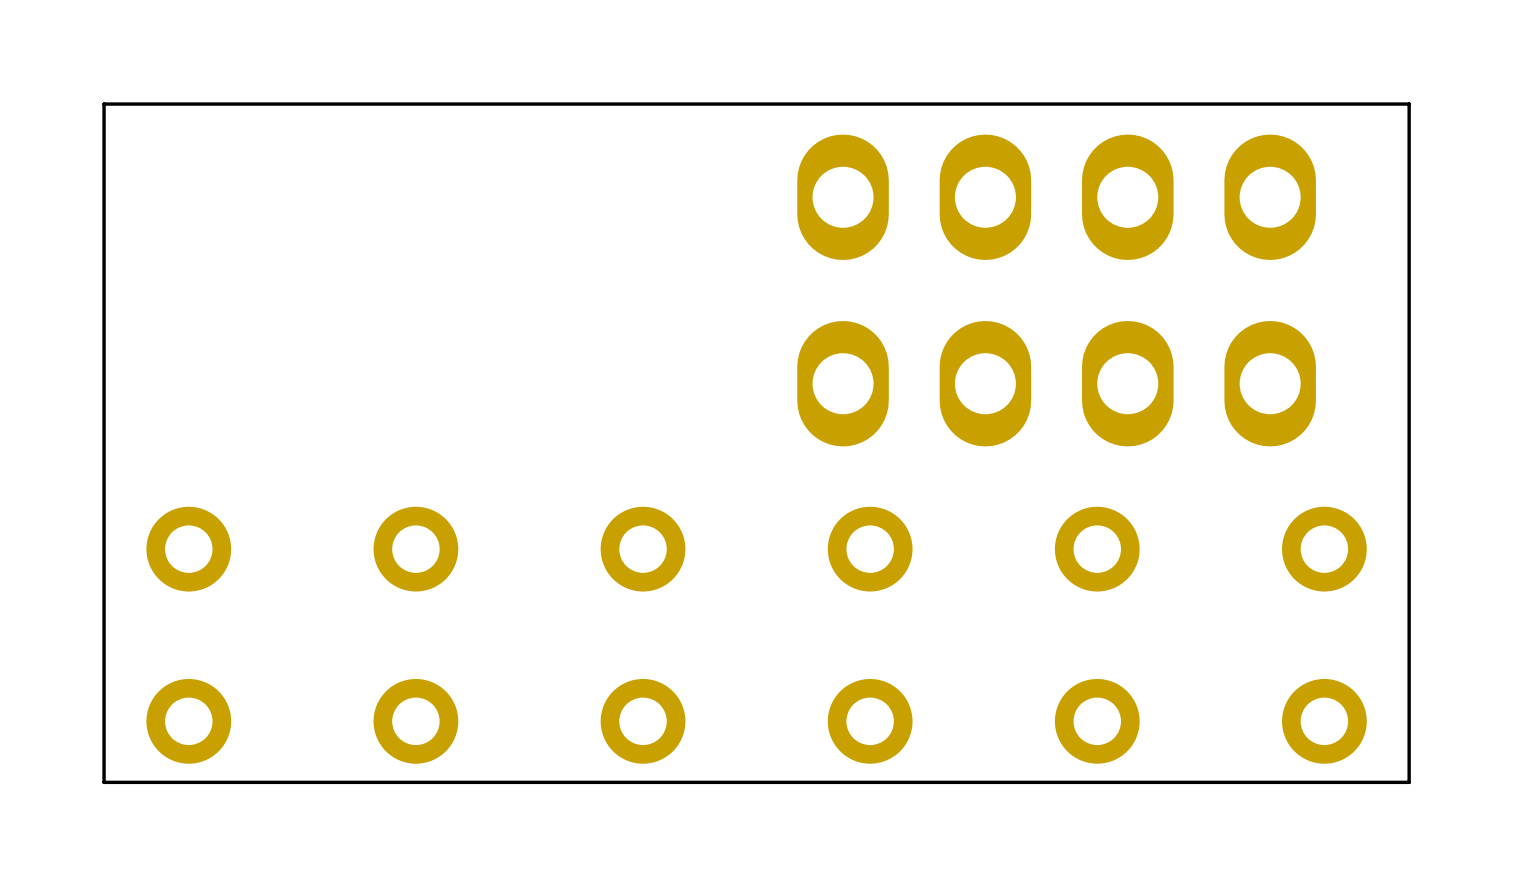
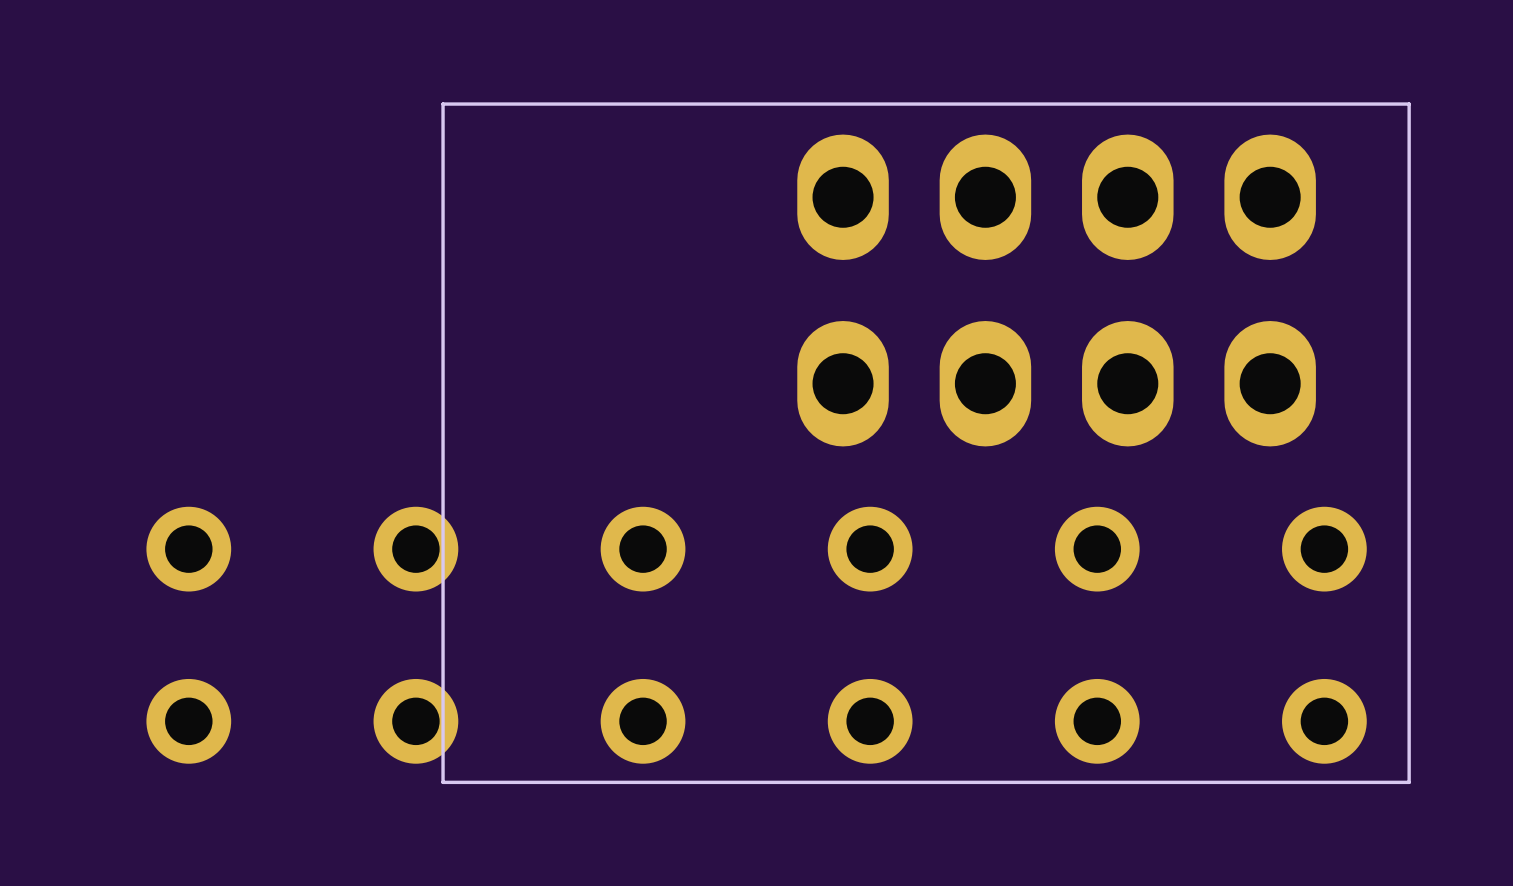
board edge: (443, 104) (104, 104) (104, 782) (443, 782) -> (443, 104) (443, 782)

